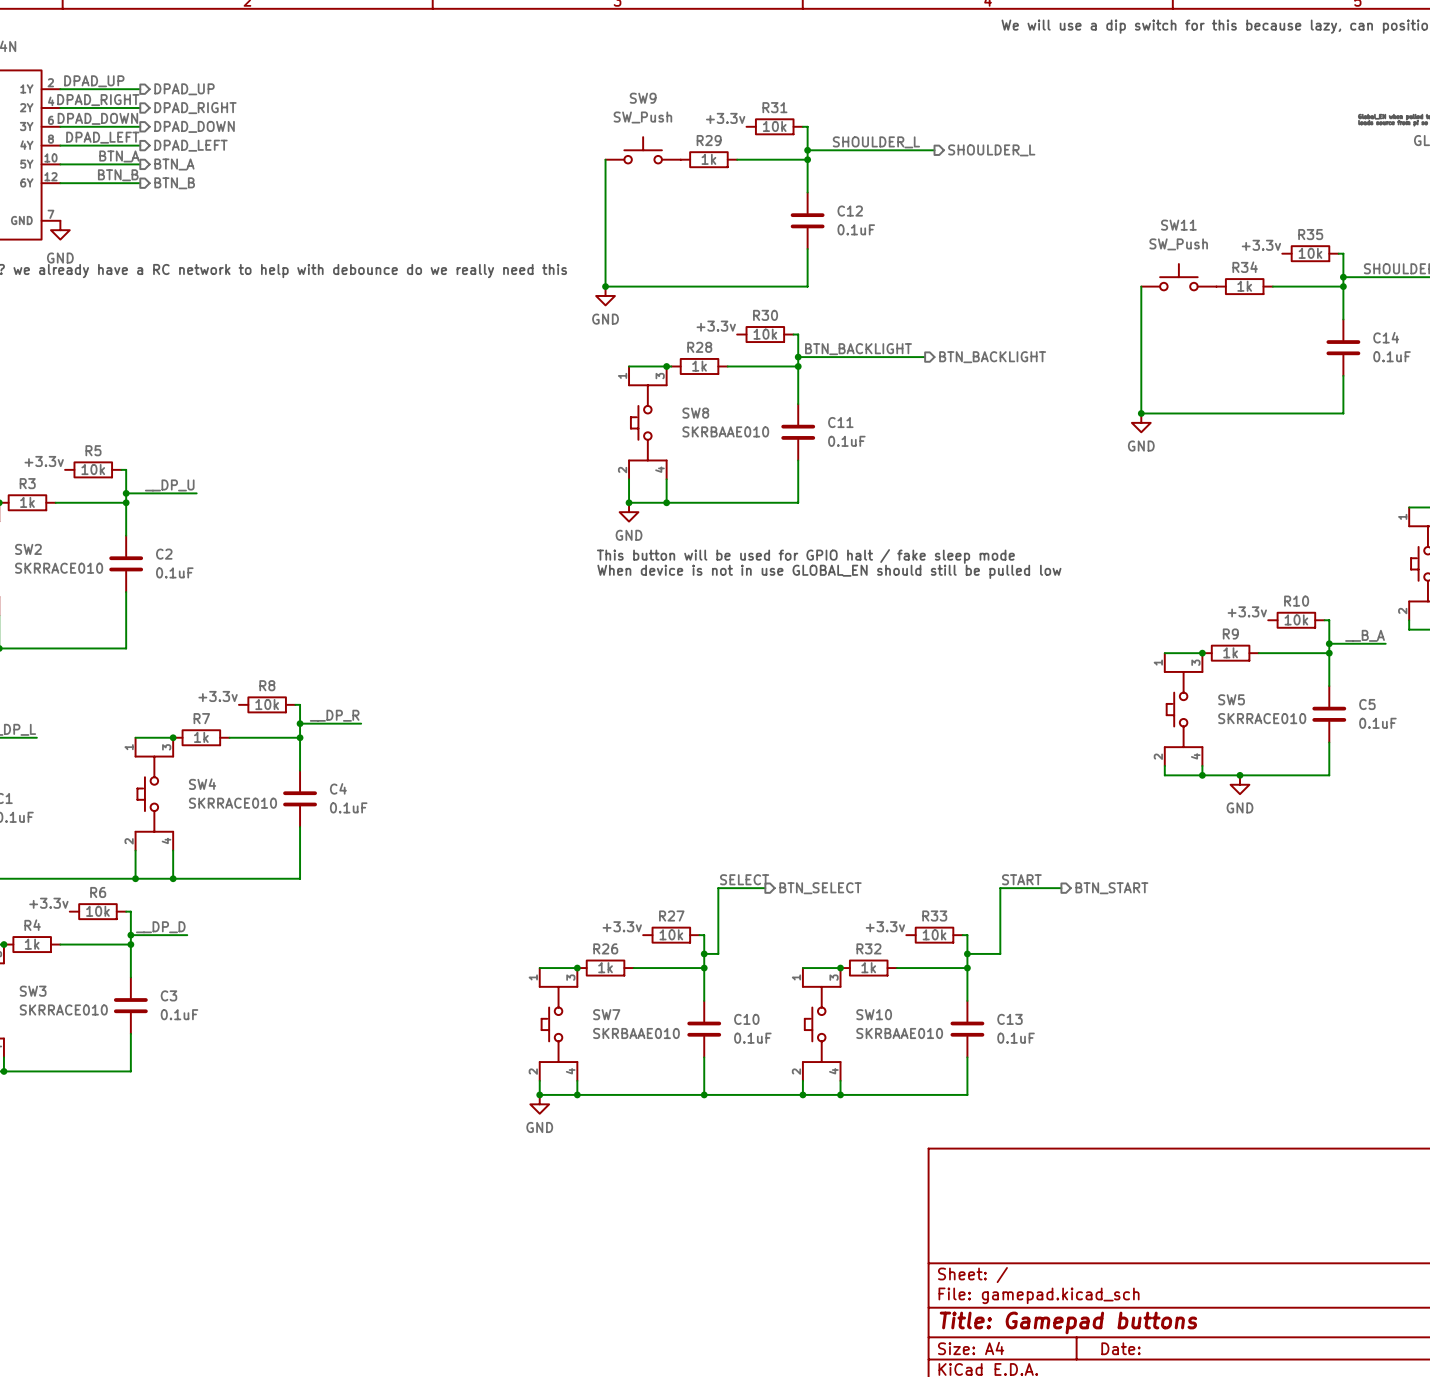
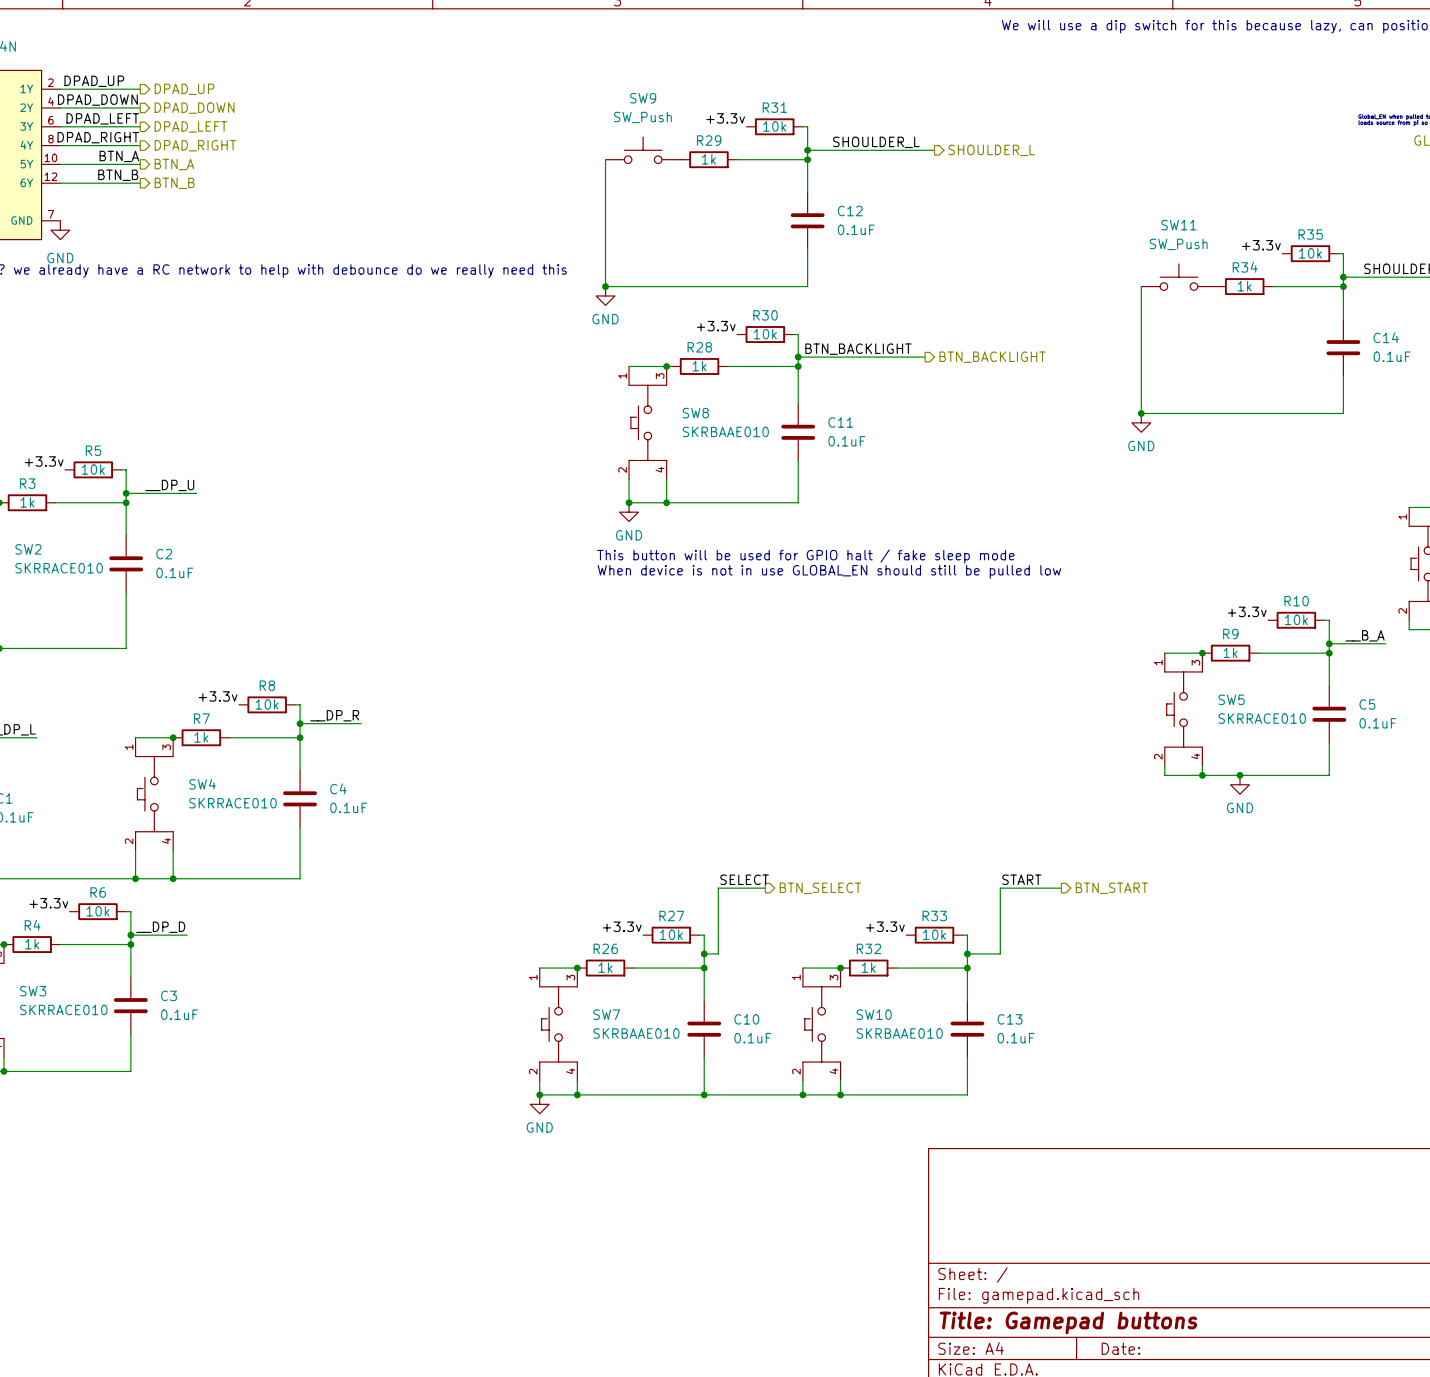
label: DPAD_RIGHT (98, 100) -> DPAD_DOWN (97, 100)
hierarchical label: DPAD_RIGHT (195, 108) -> DPAD_DOWN (194, 108)
label: DPAD_DOWN (97, 118) -> DPAD_LEFT (102, 118)
hierarchical label: DPAD_DOWN (194, 126) -> DPAD_LEFT (190, 126)
label: DPAD_LEFT (102, 137) -> DPAD_RIGHT (98, 137)
hierarchical label: DPAD_LEFT (190, 145) -> DPAD_RIGHT (195, 145)

